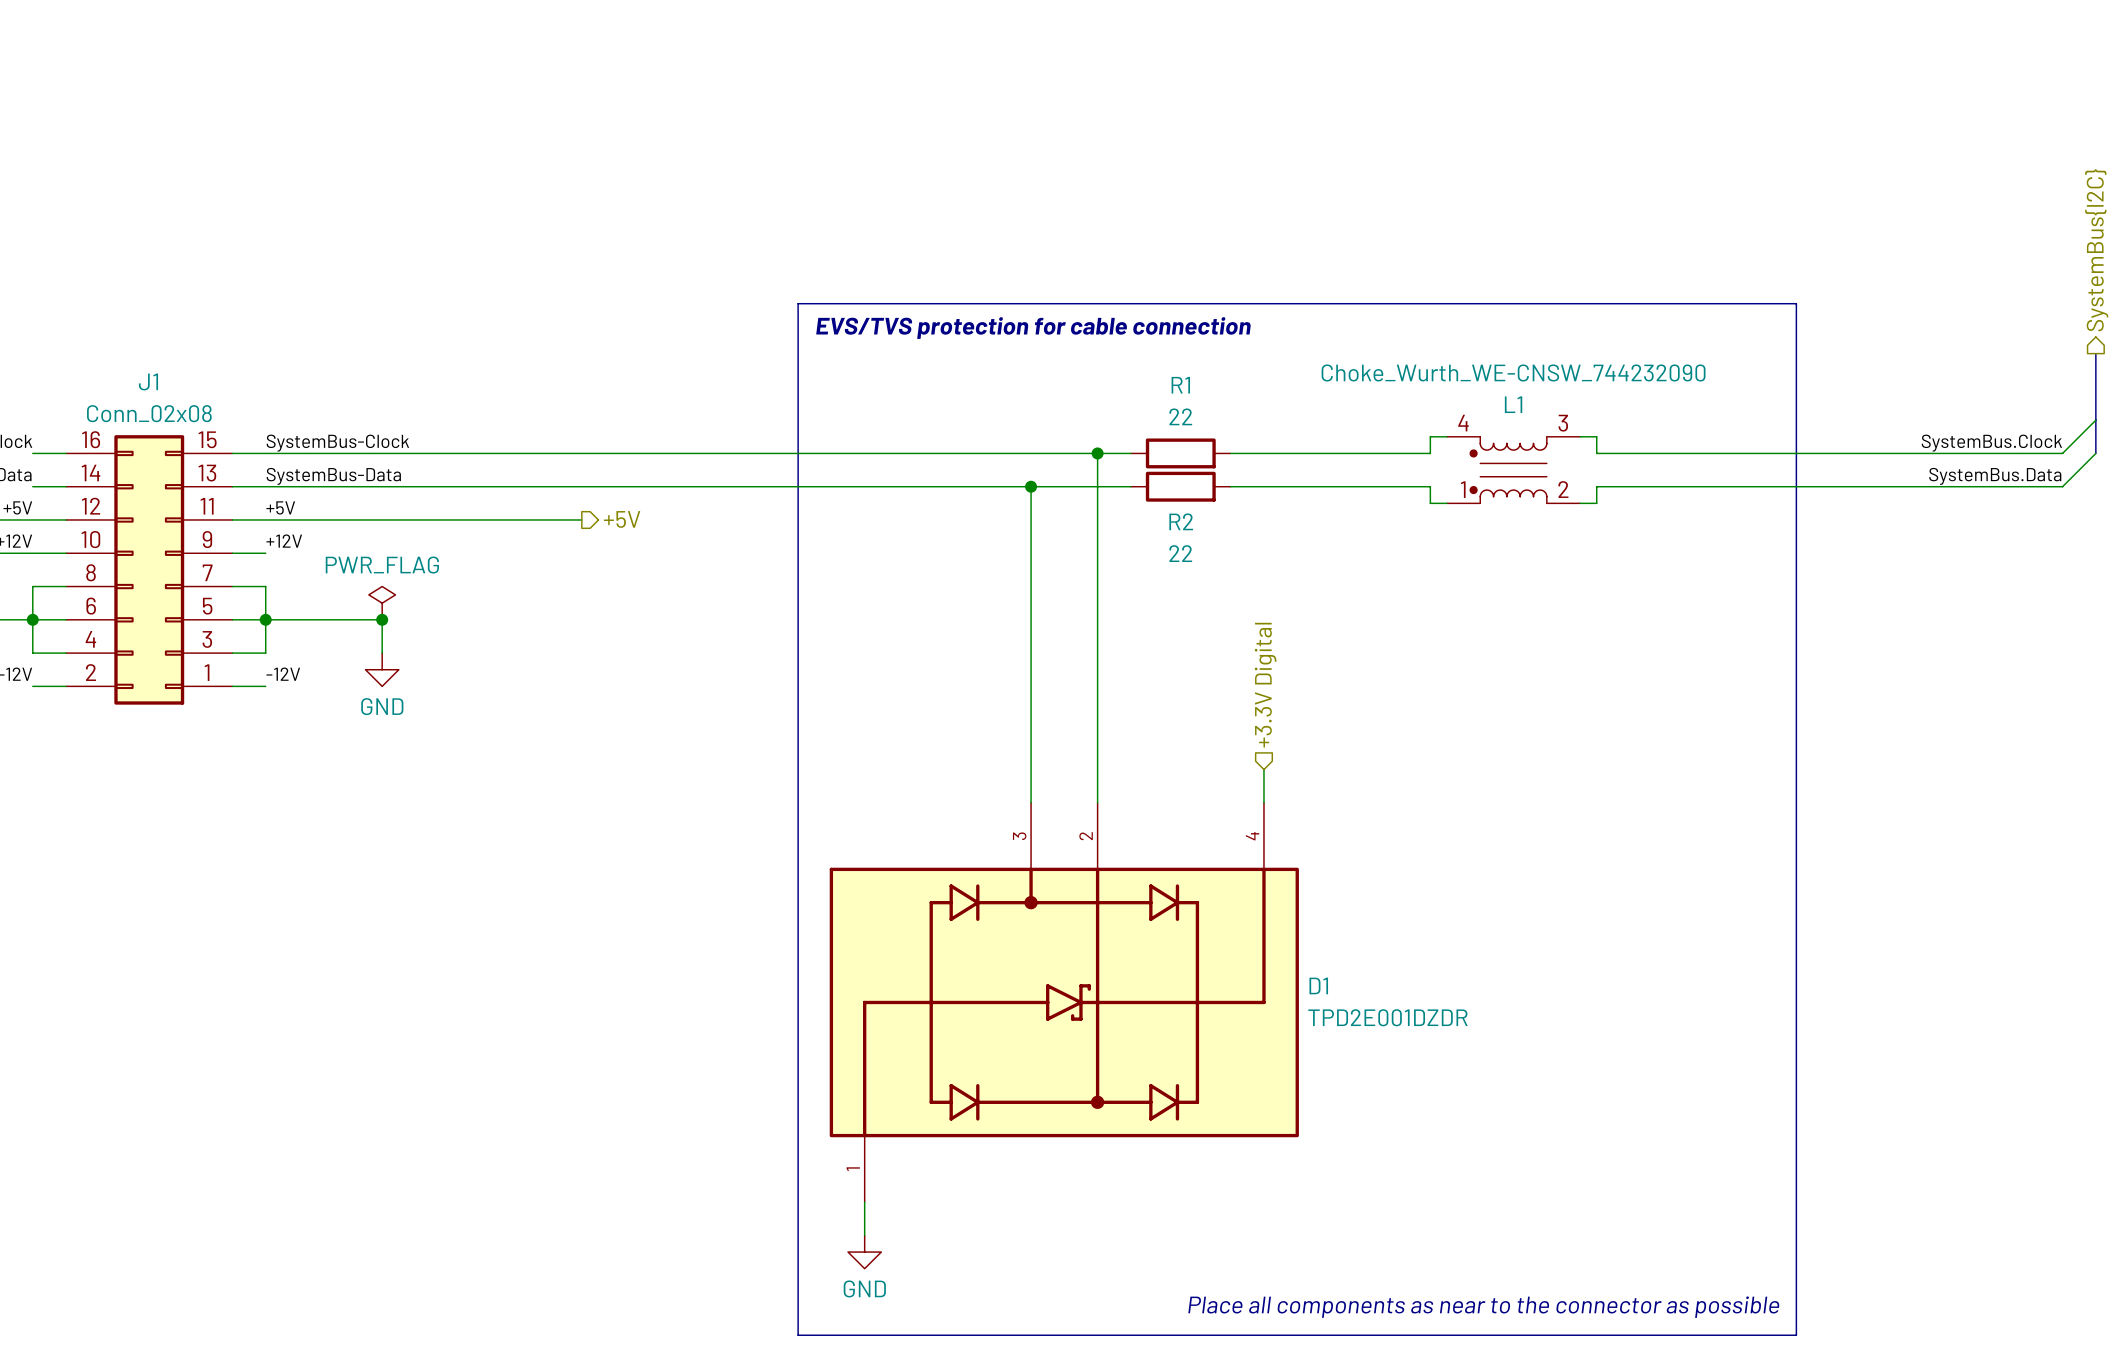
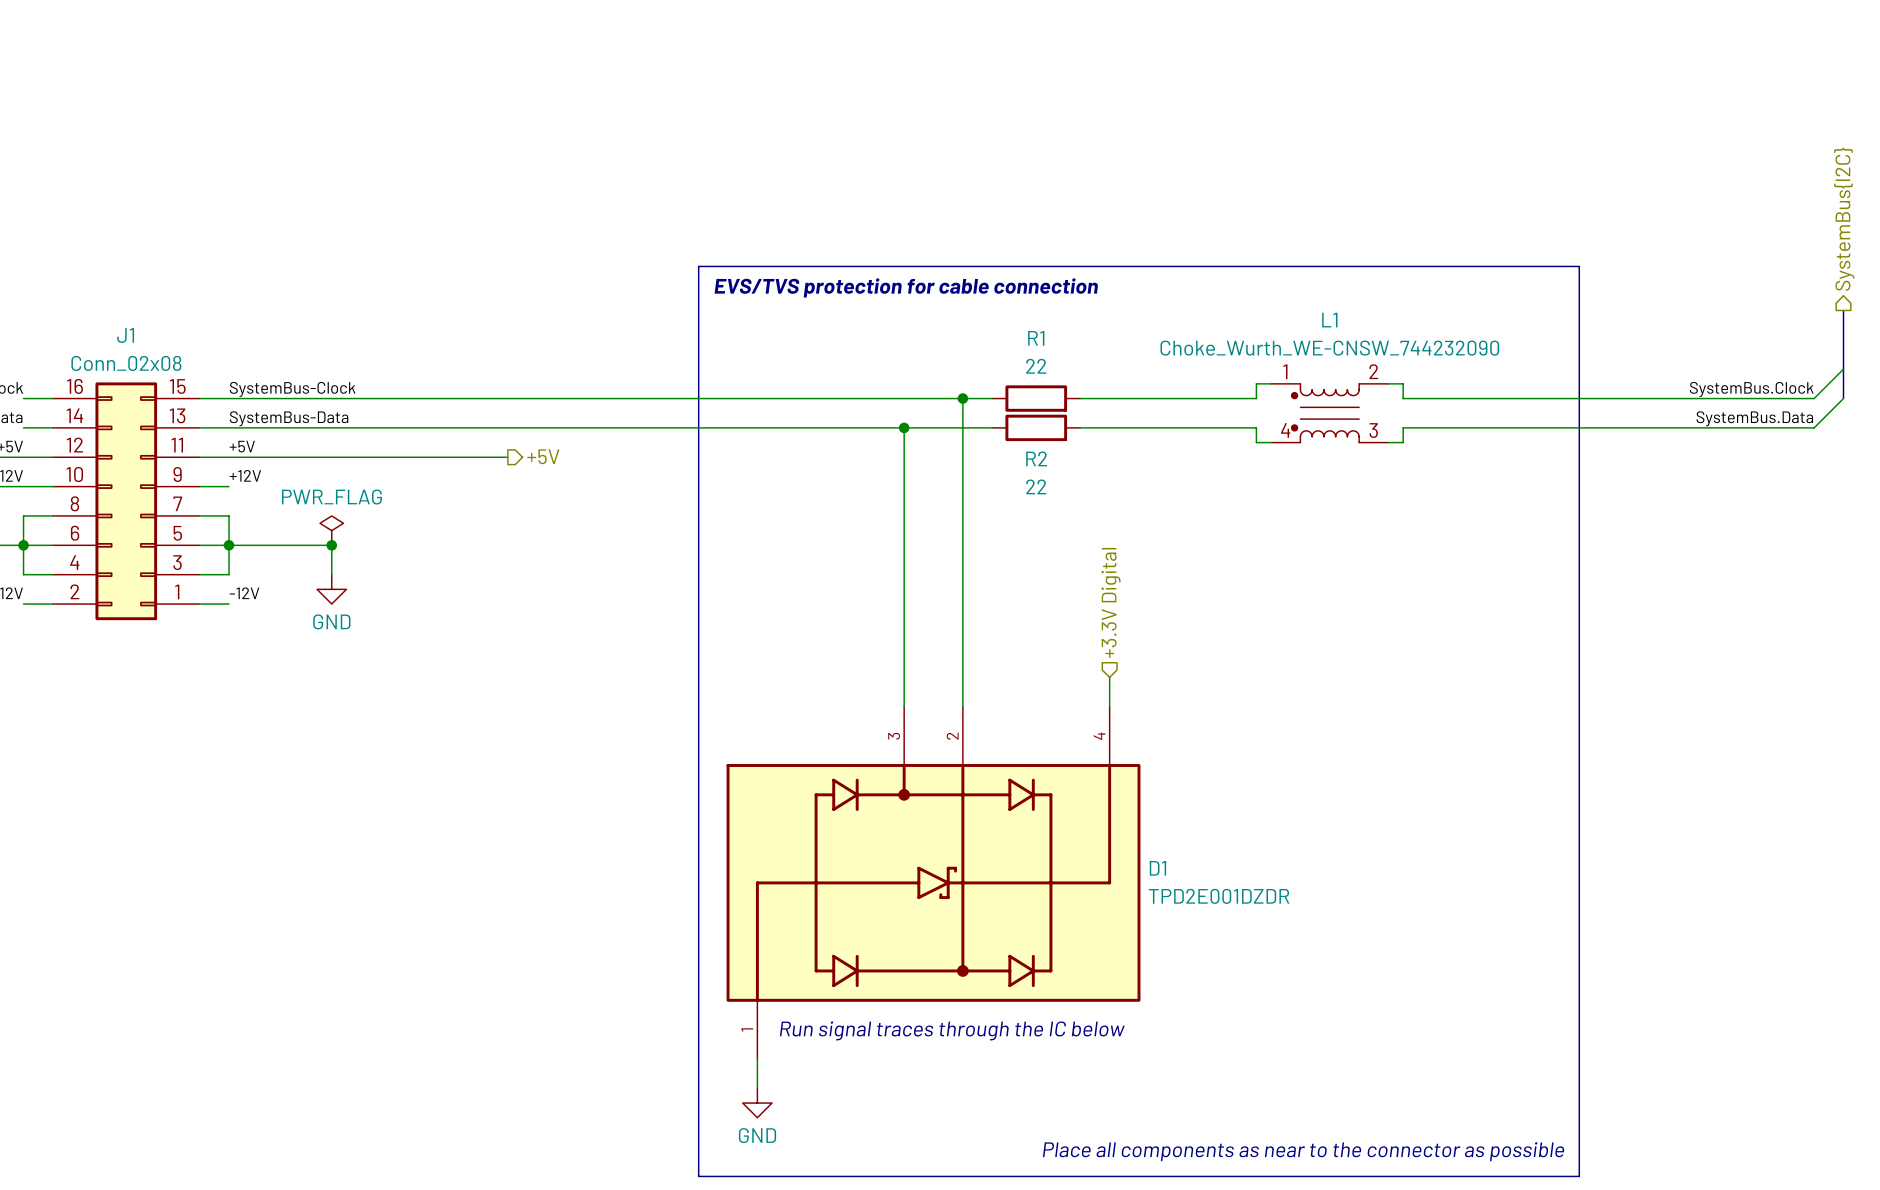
L1 name position: L1 (1513, 404) -> L1 (1329, 320)
L1 flip: as is (1508, 470) -> up-down (1325, 413)
text: none -> Run signal traces through the IC below (952, 1030)

